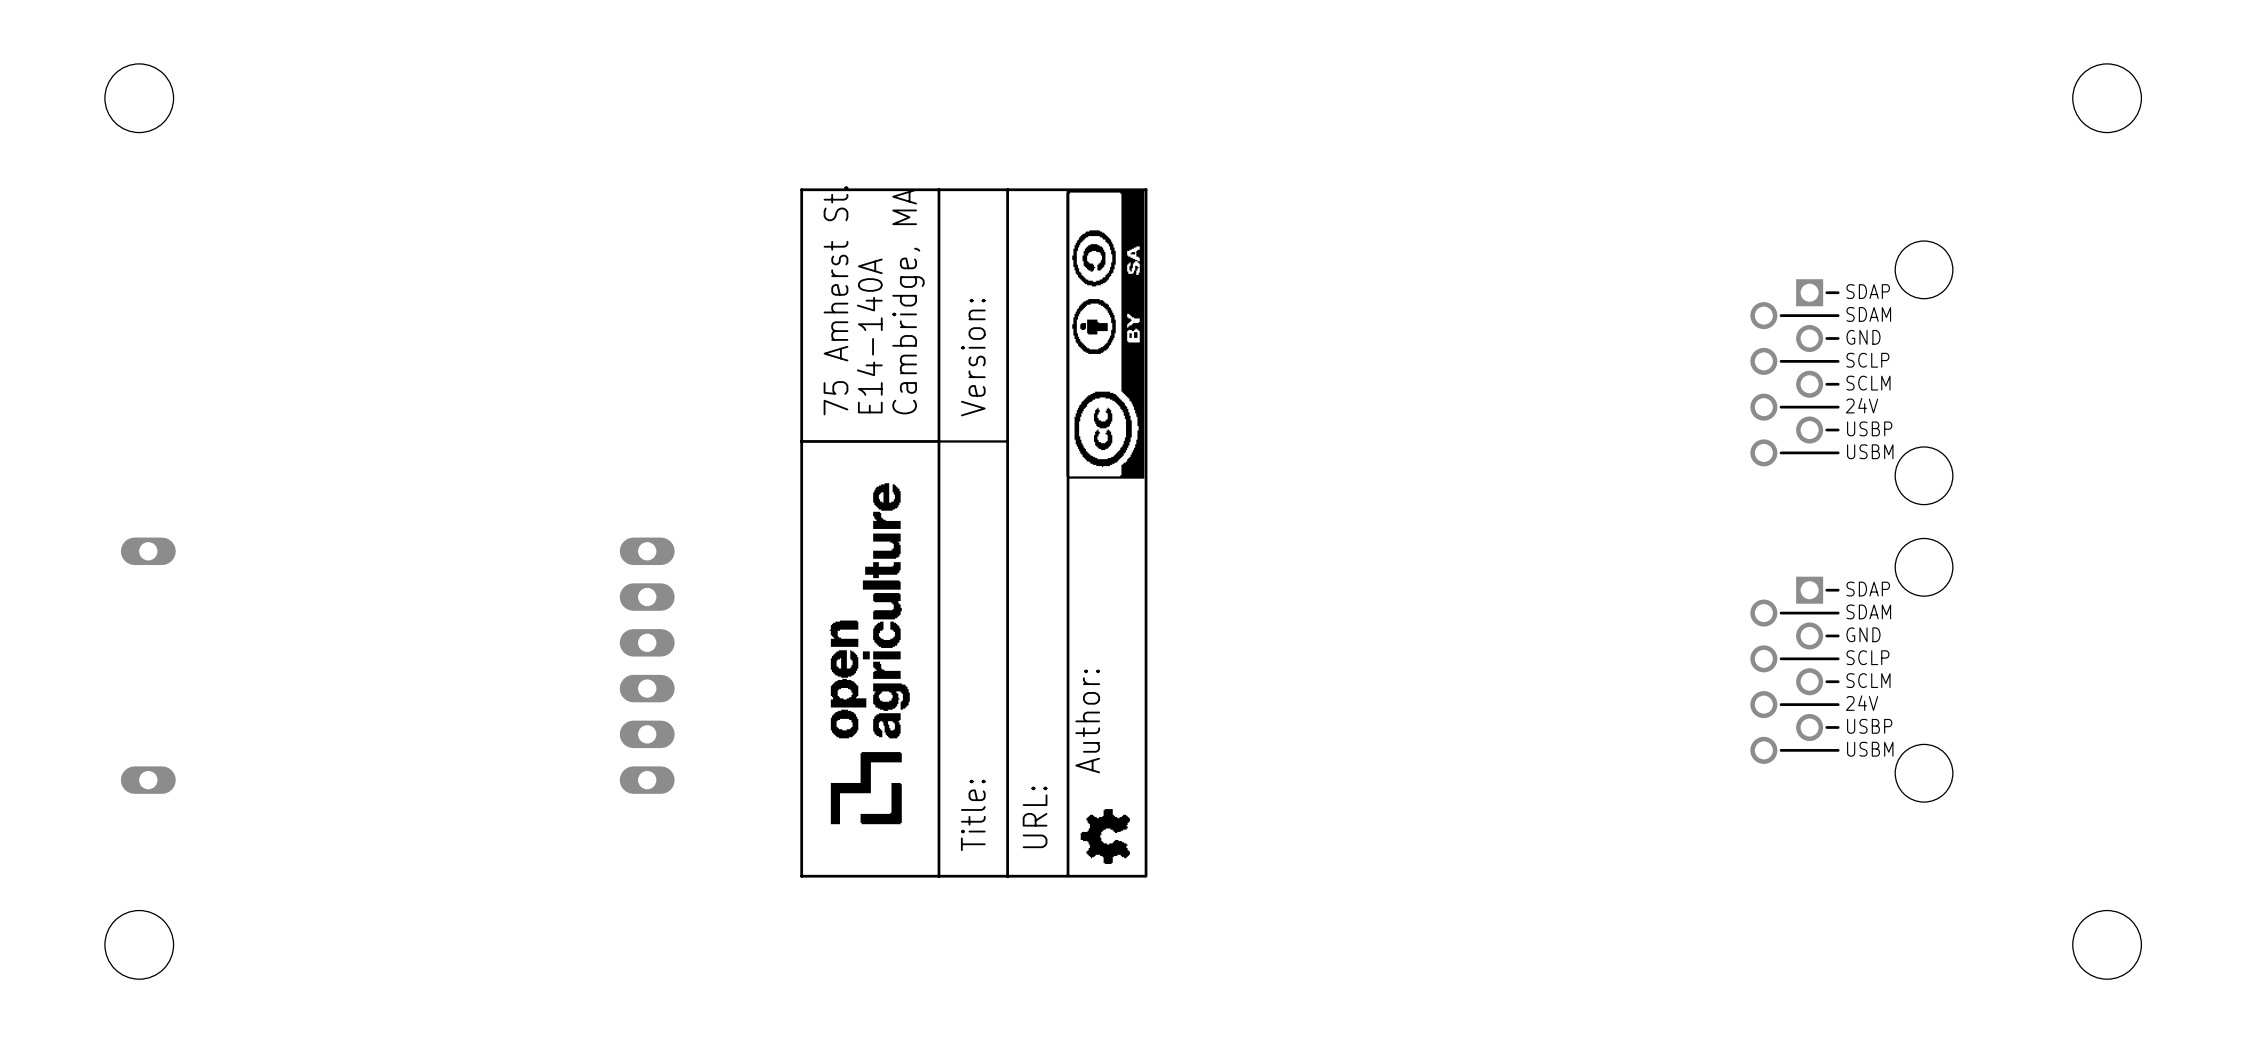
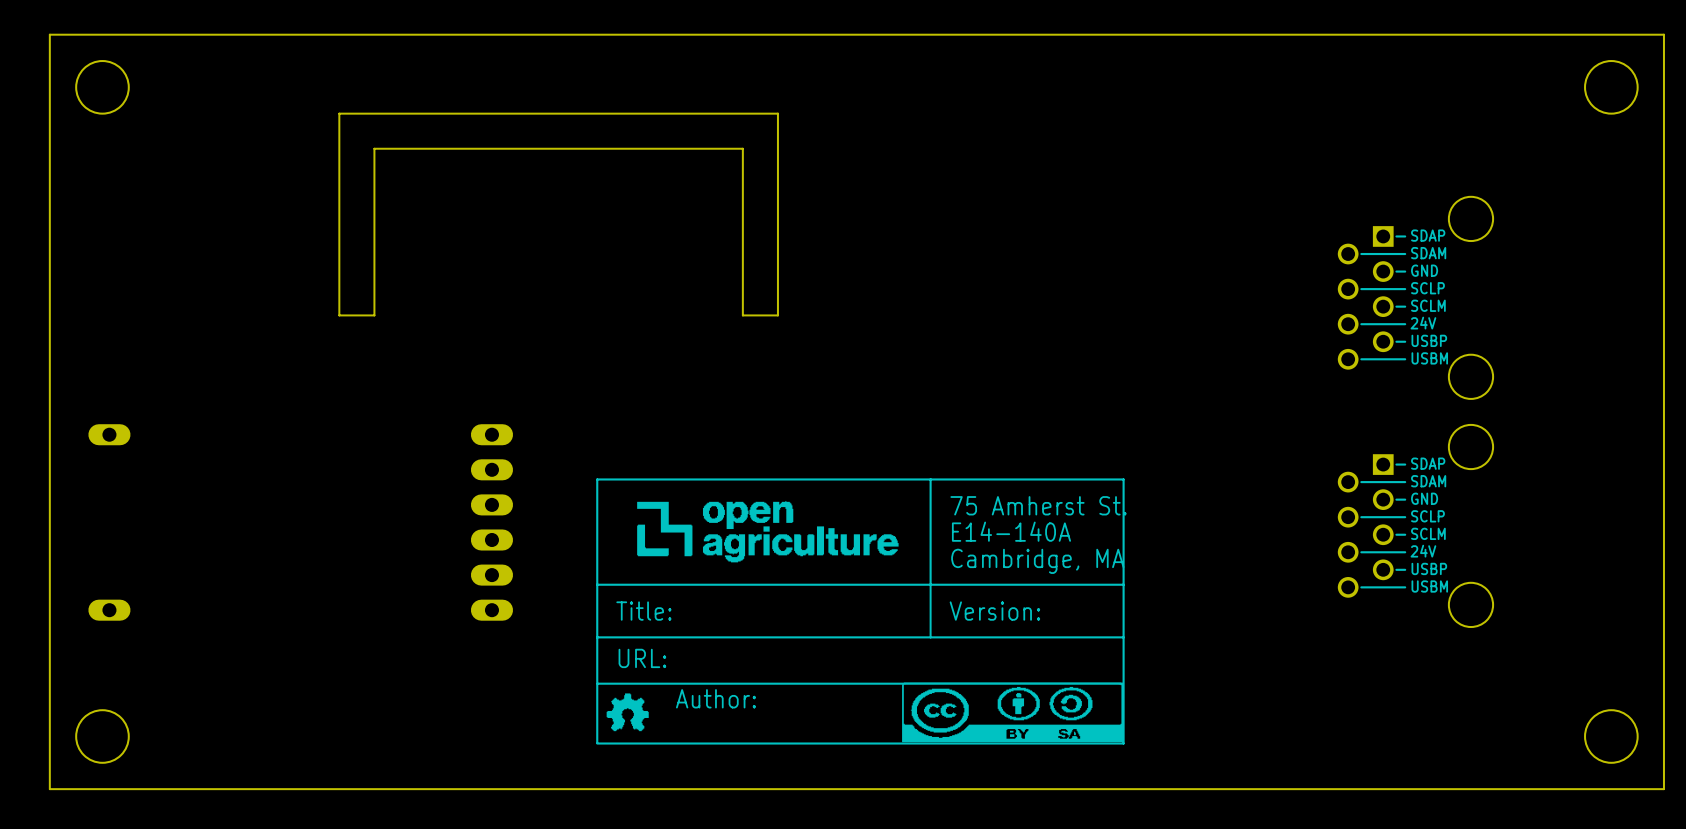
board edge: none -> (1663, 34) (49, 34) (49, 789) (1663, 789) (1663, 34)
board edge: none -> (777, 113) (339, 113) (339, 315) (374, 315) (374, 148) (742, 148) (742, 315) (777, 315) (777, 113)
drawing: [800, 188, 1148, 878] -> none
drawing: none -> [596, 478, 1125, 745]

